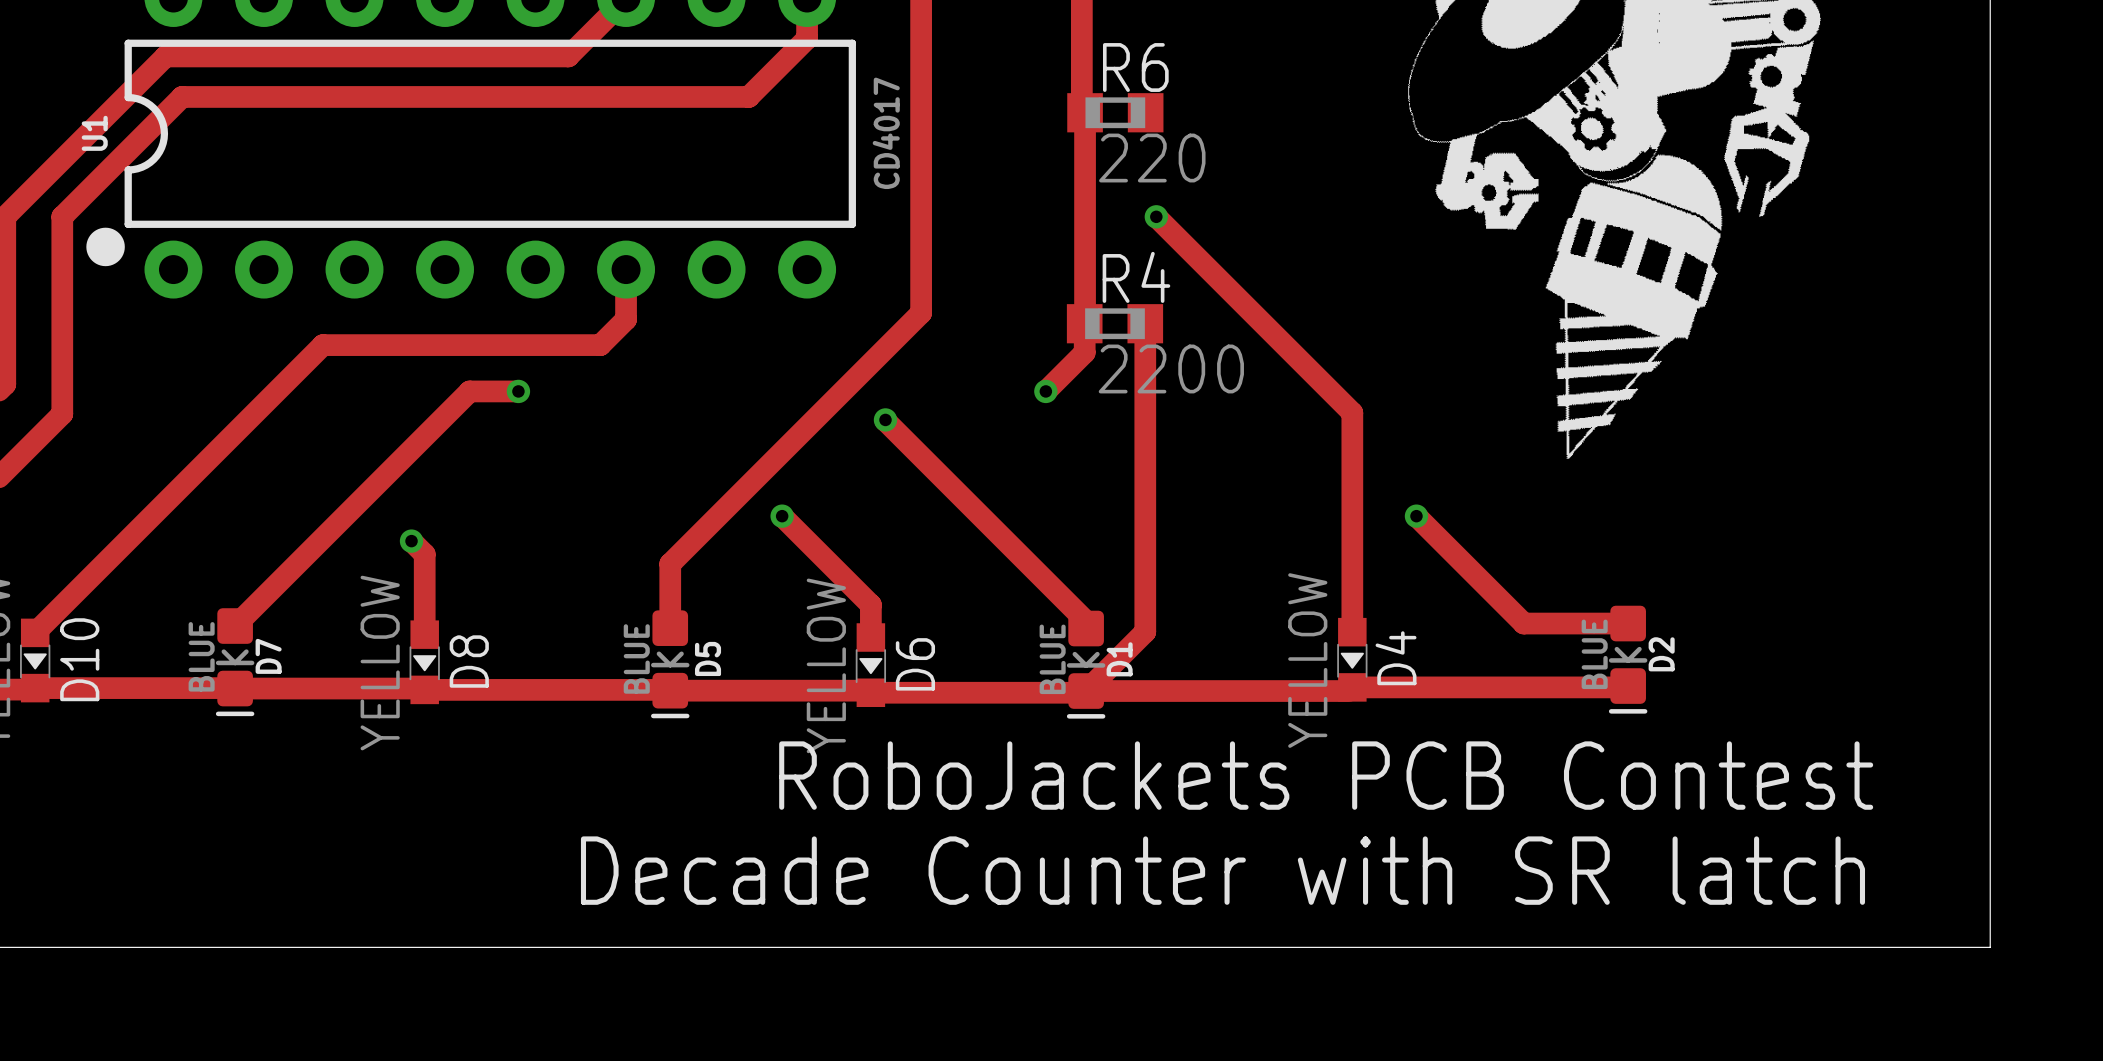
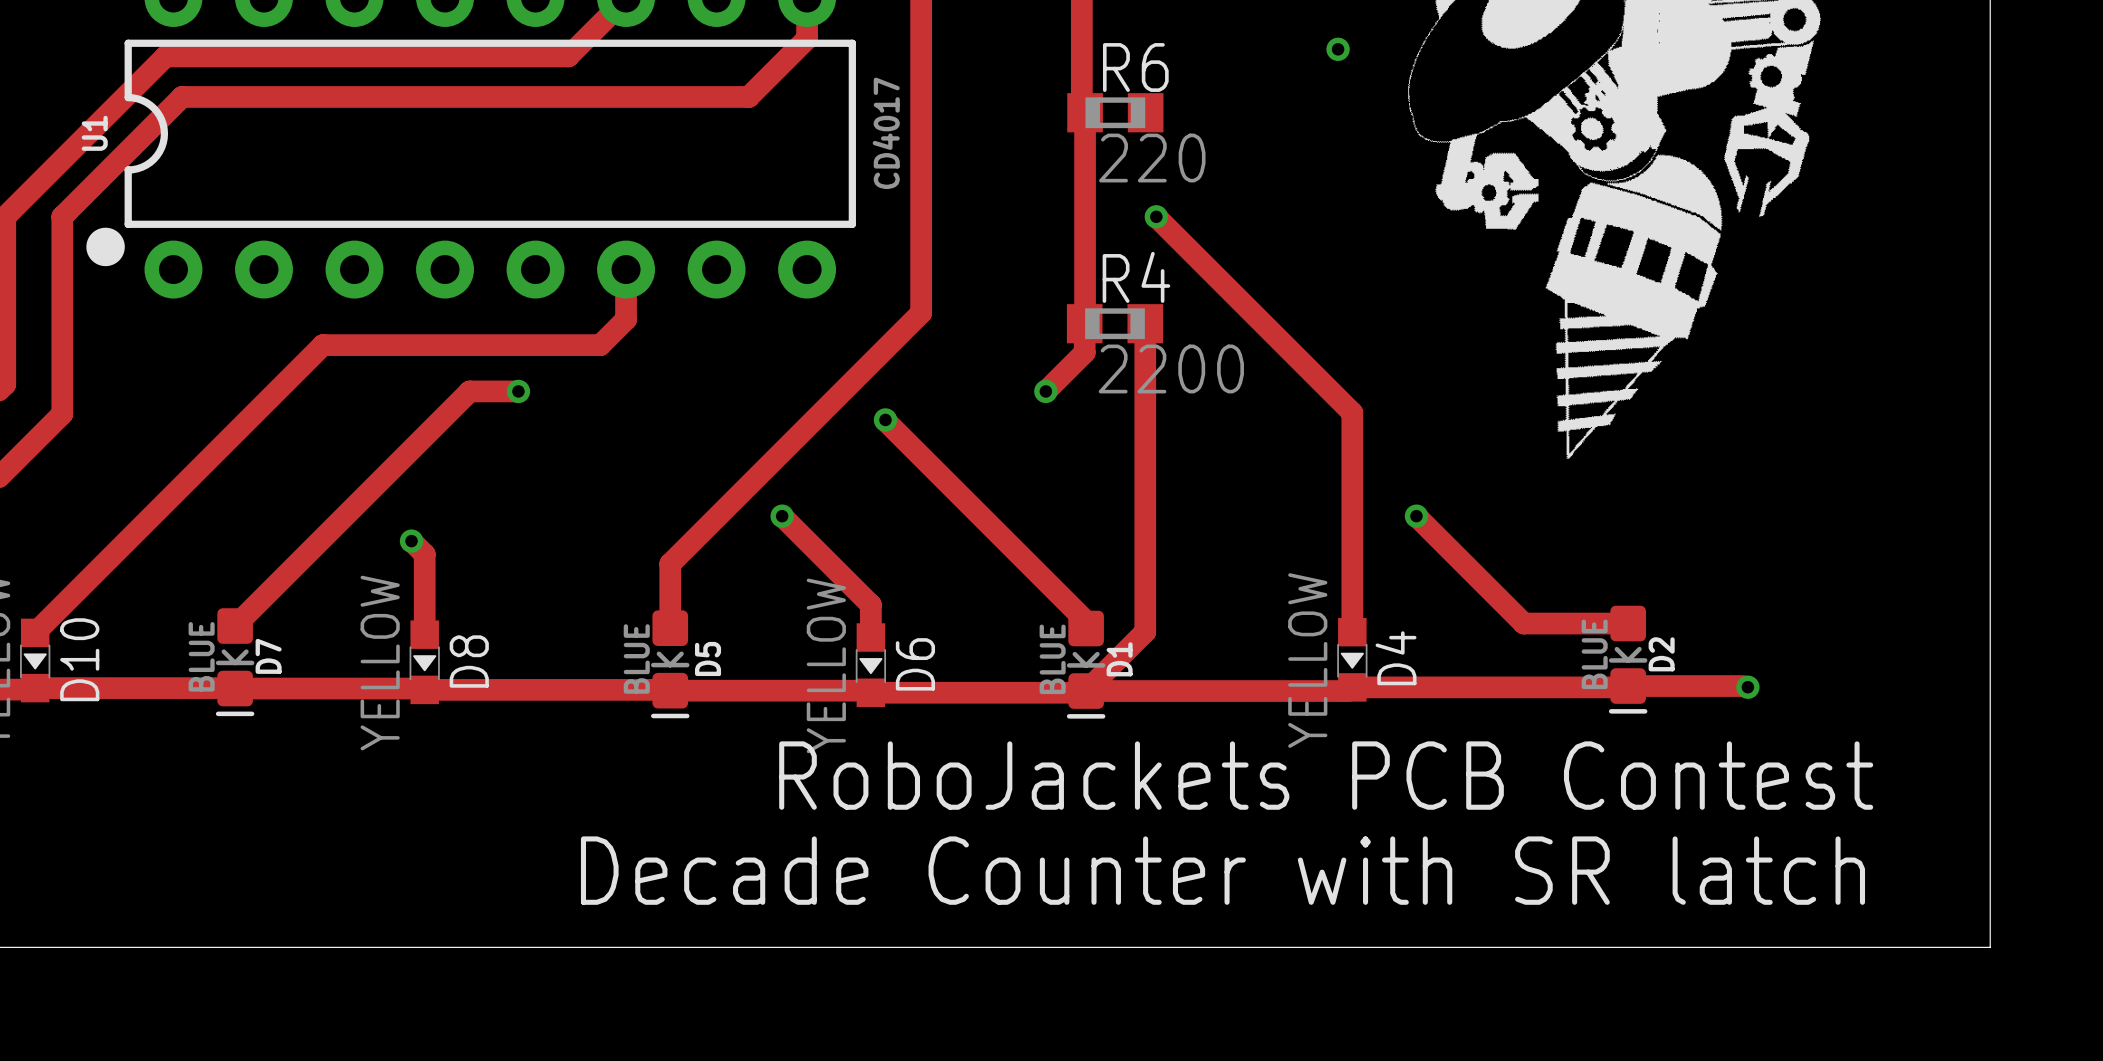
via: none -> (1338, 49)
track: none -> (1628, 686) (1747, 687)
via: none -> (1747, 687)

